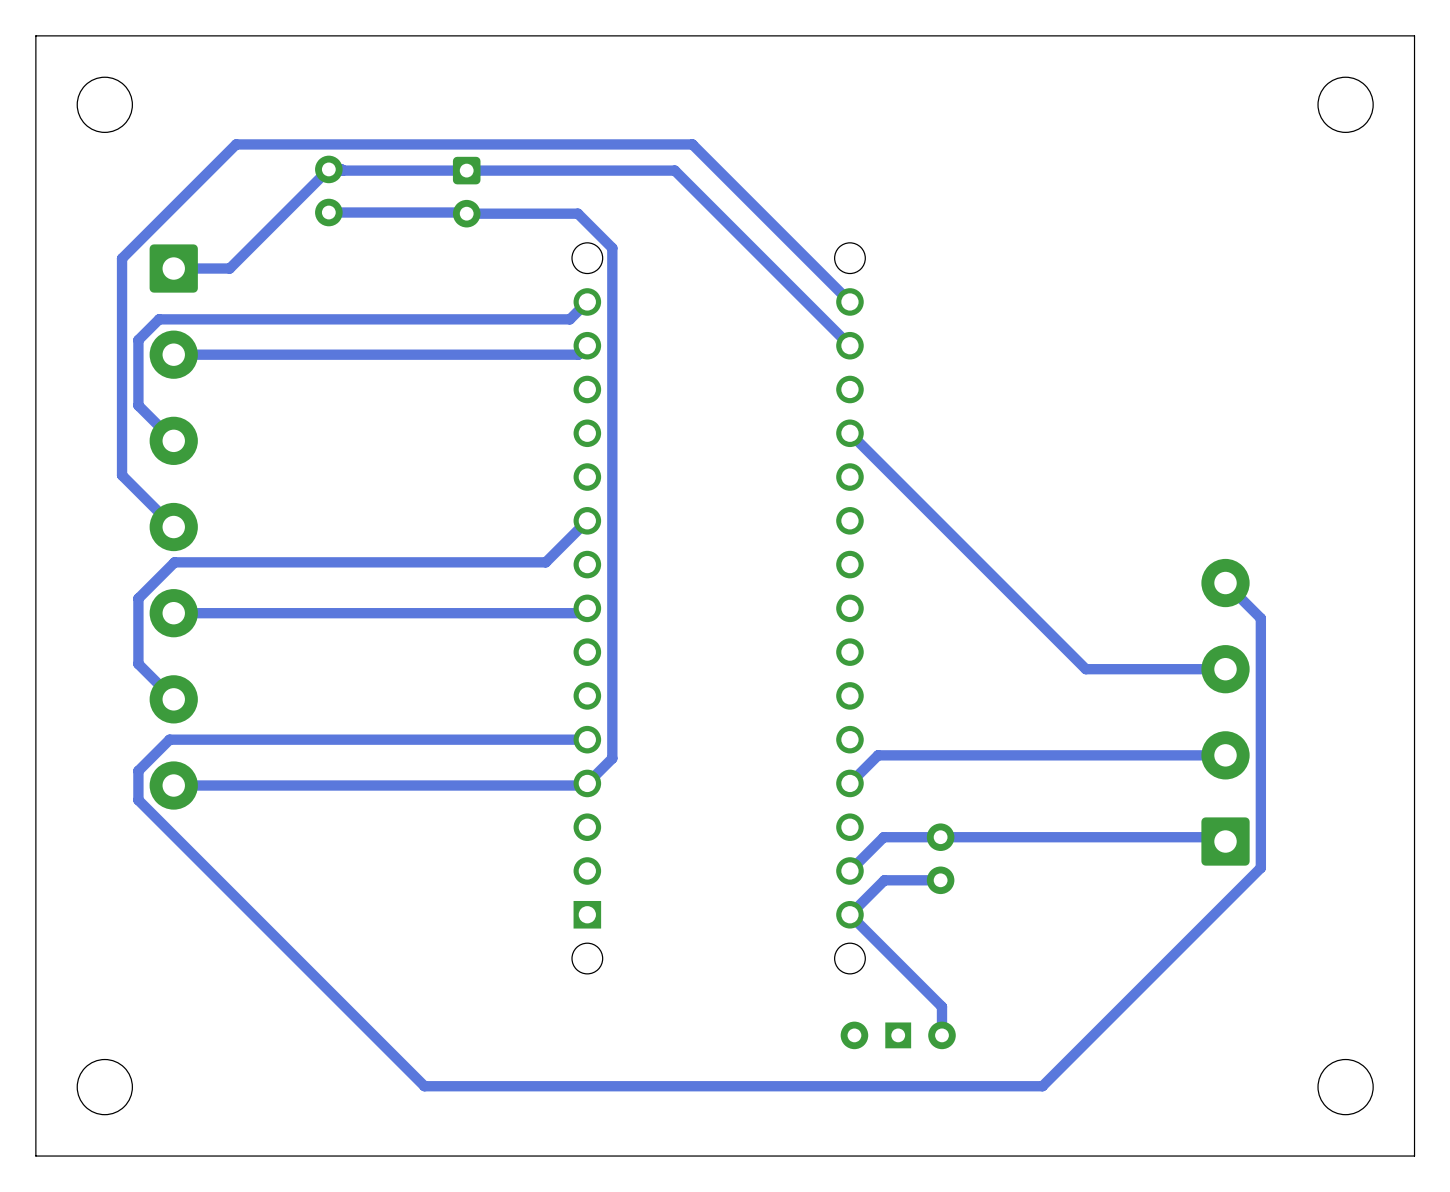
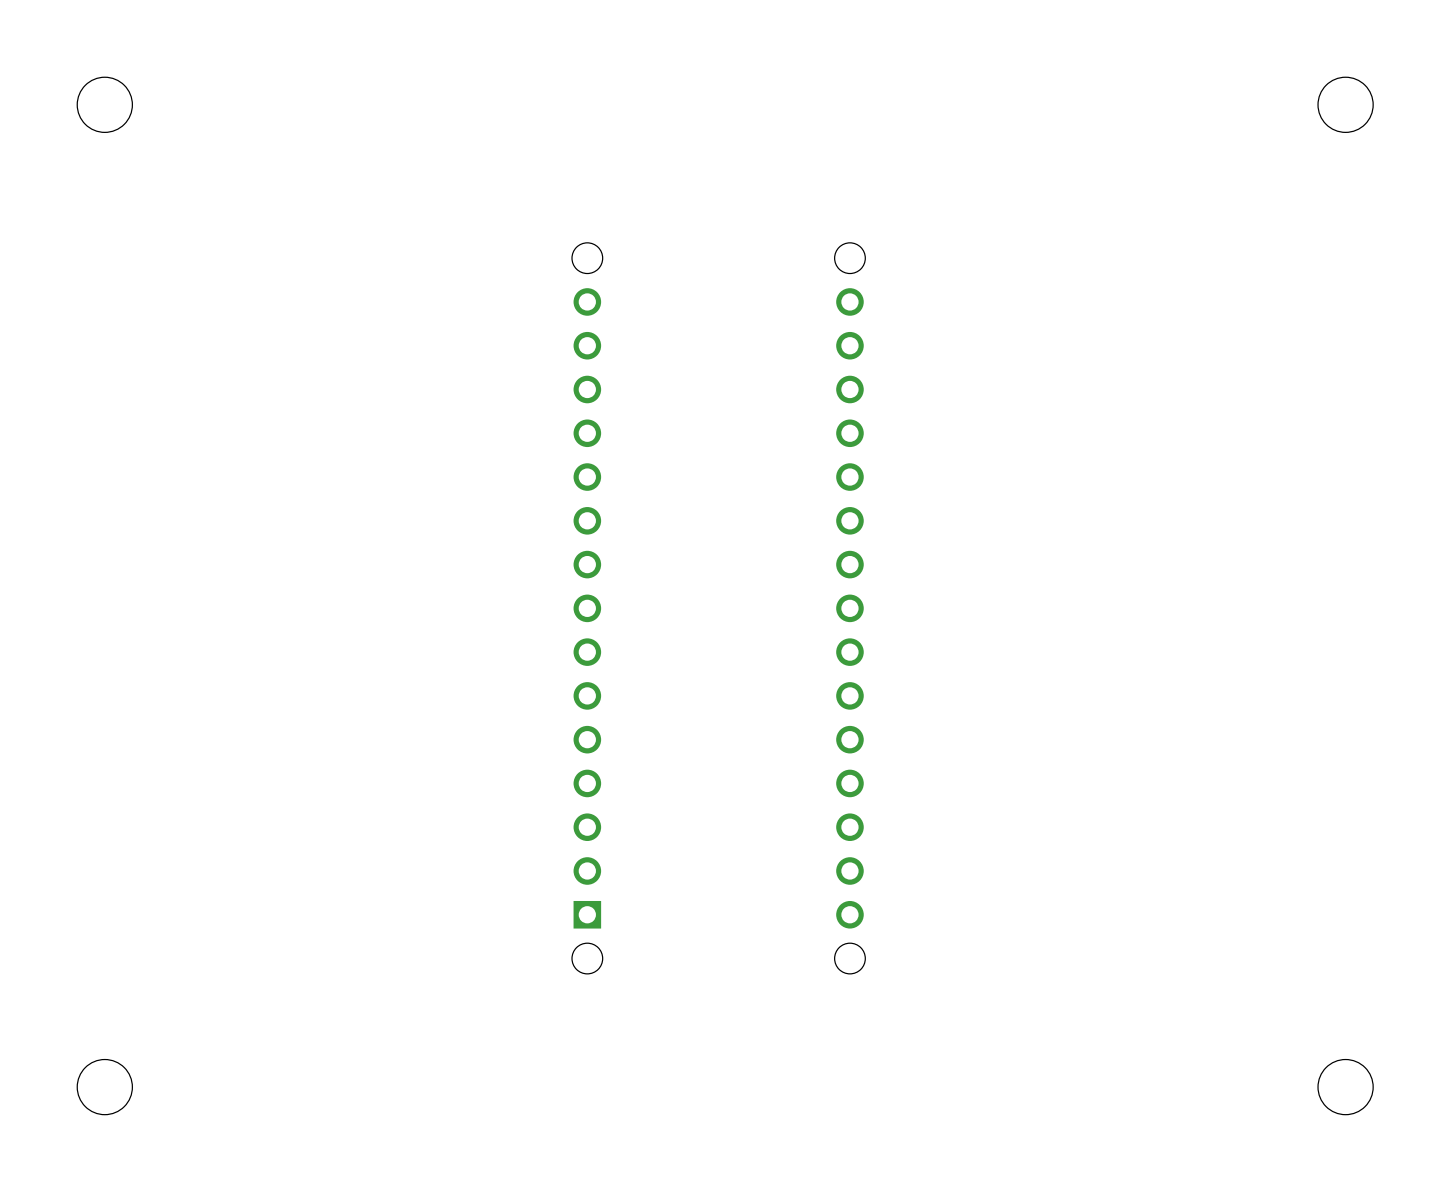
board edge: (1414, 35) (35, 35) (35, 1156) (1414, 1156) (1414, 35) -> none
part: (328, 190) -> none
part: (466, 192) -> none
track: (328, 212) (577, 213) (612, 248) (612, 758) (585, 785) (173, 785) -> none
track: (173, 268) (229, 268) (328, 169) (674, 170) (849, 345) -> none
track: (587, 301) (569, 319) (159, 319) (138, 340) (138, 405) (173, 440) -> none
track: (849, 301) (692, 144) (236, 144) (122, 258) (122, 475) (173, 527) -> none
track: (587, 345) (578, 354) (173, 354) -> none
track: (849, 433) (1085, 669) (1225, 669) -> none
track: (587, 520) (545, 562) (174, 562) (138, 598) (138, 664) (173, 699) -> none
part: (173, 527) -> none
track: (1225, 583) (1260, 618) (1260, 867) (1042, 1086) (424, 1086) (138, 800) (138, 770) (169, 739) (587, 739) -> none
track: (587, 608) (582, 613) (173, 613) -> none
part: (1225, 712) -> none
track: (1225, 755) (878, 755) (849, 783) -> none
track: (1225, 841) (1221, 837) (883, 837) (849, 870) -> none
part: (940, 858) -> none
track: (940, 880) (884, 880) (849, 914) (941, 1006) (941, 1035) -> none
part: (898, 1035) -> none

